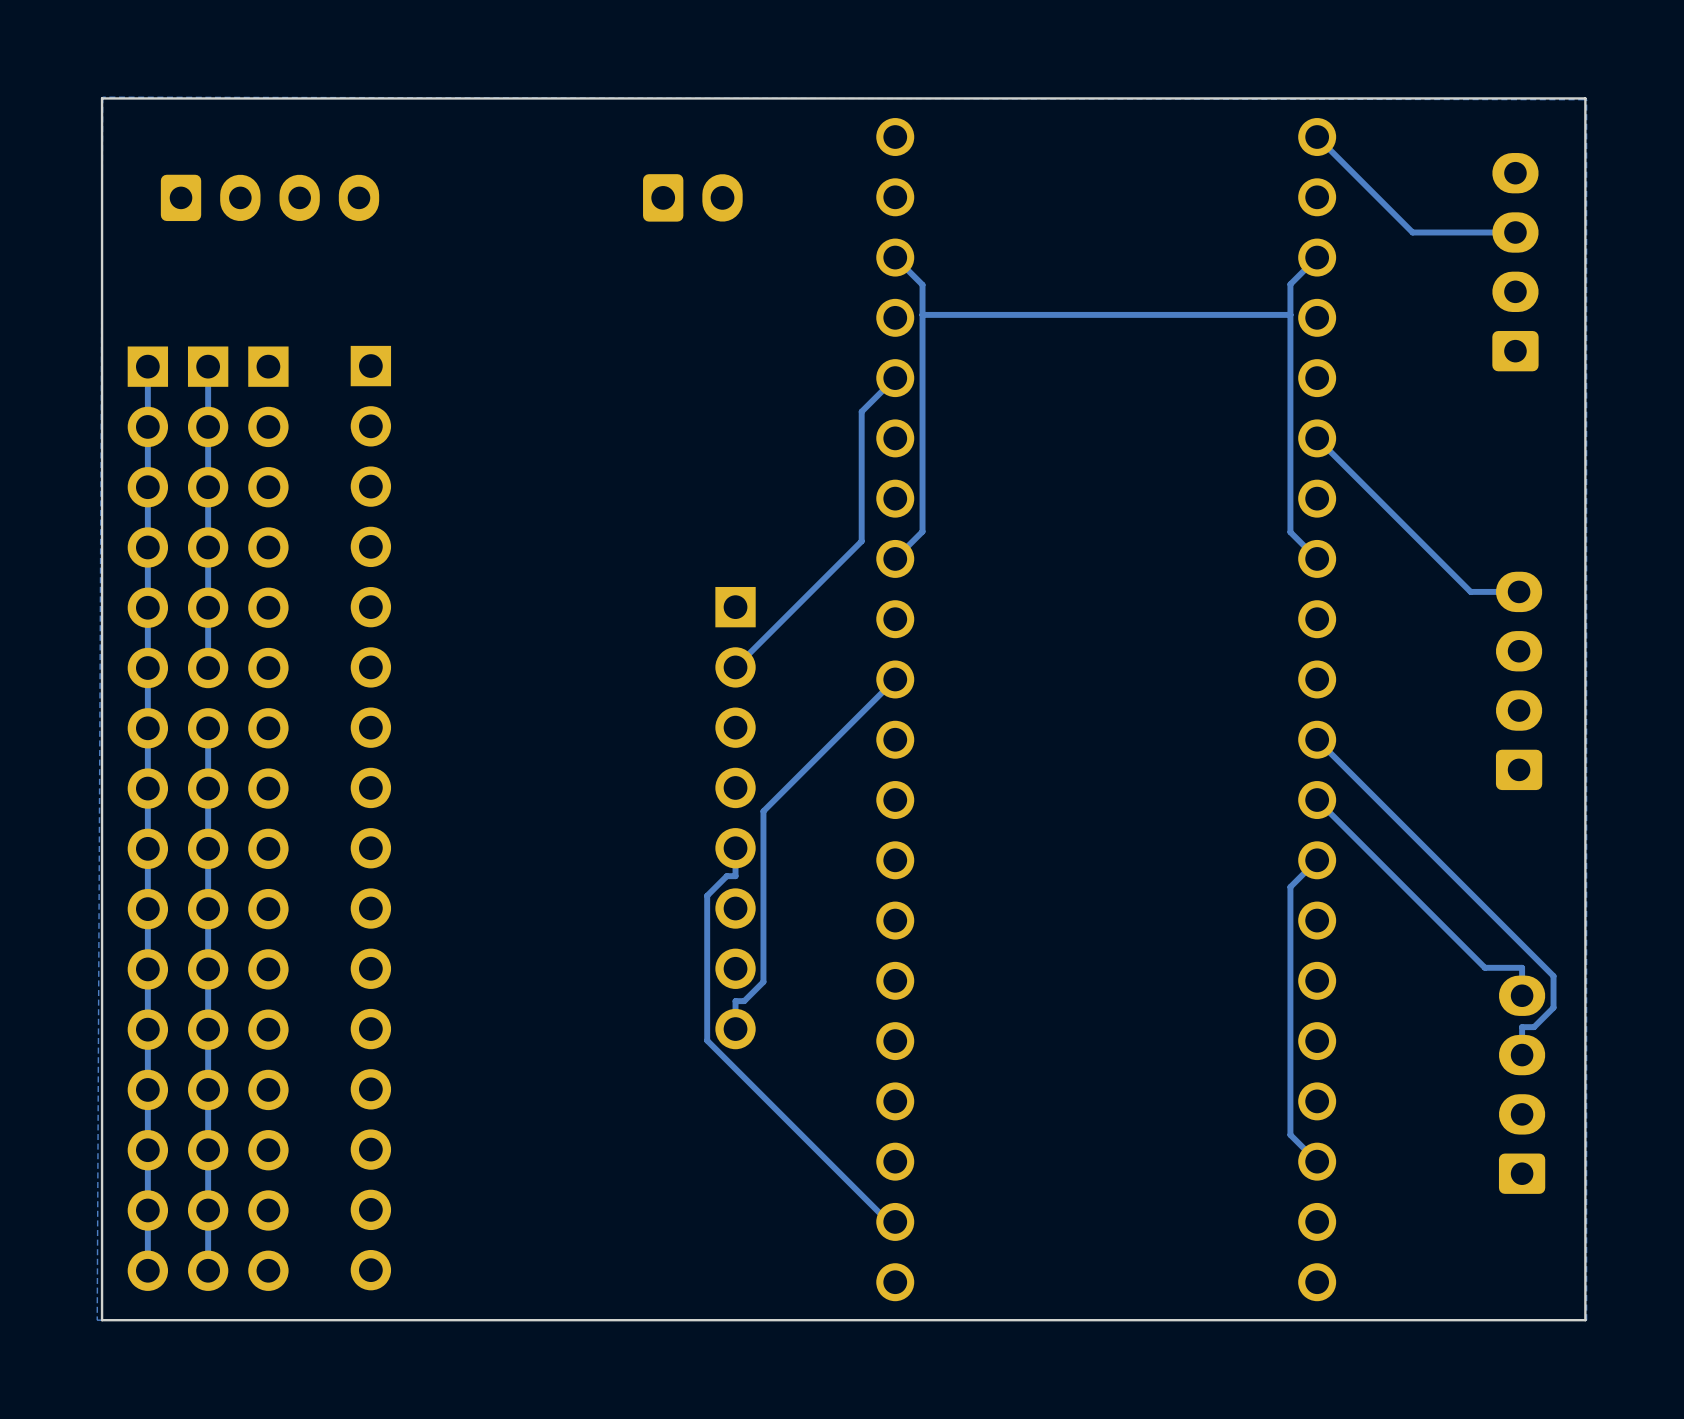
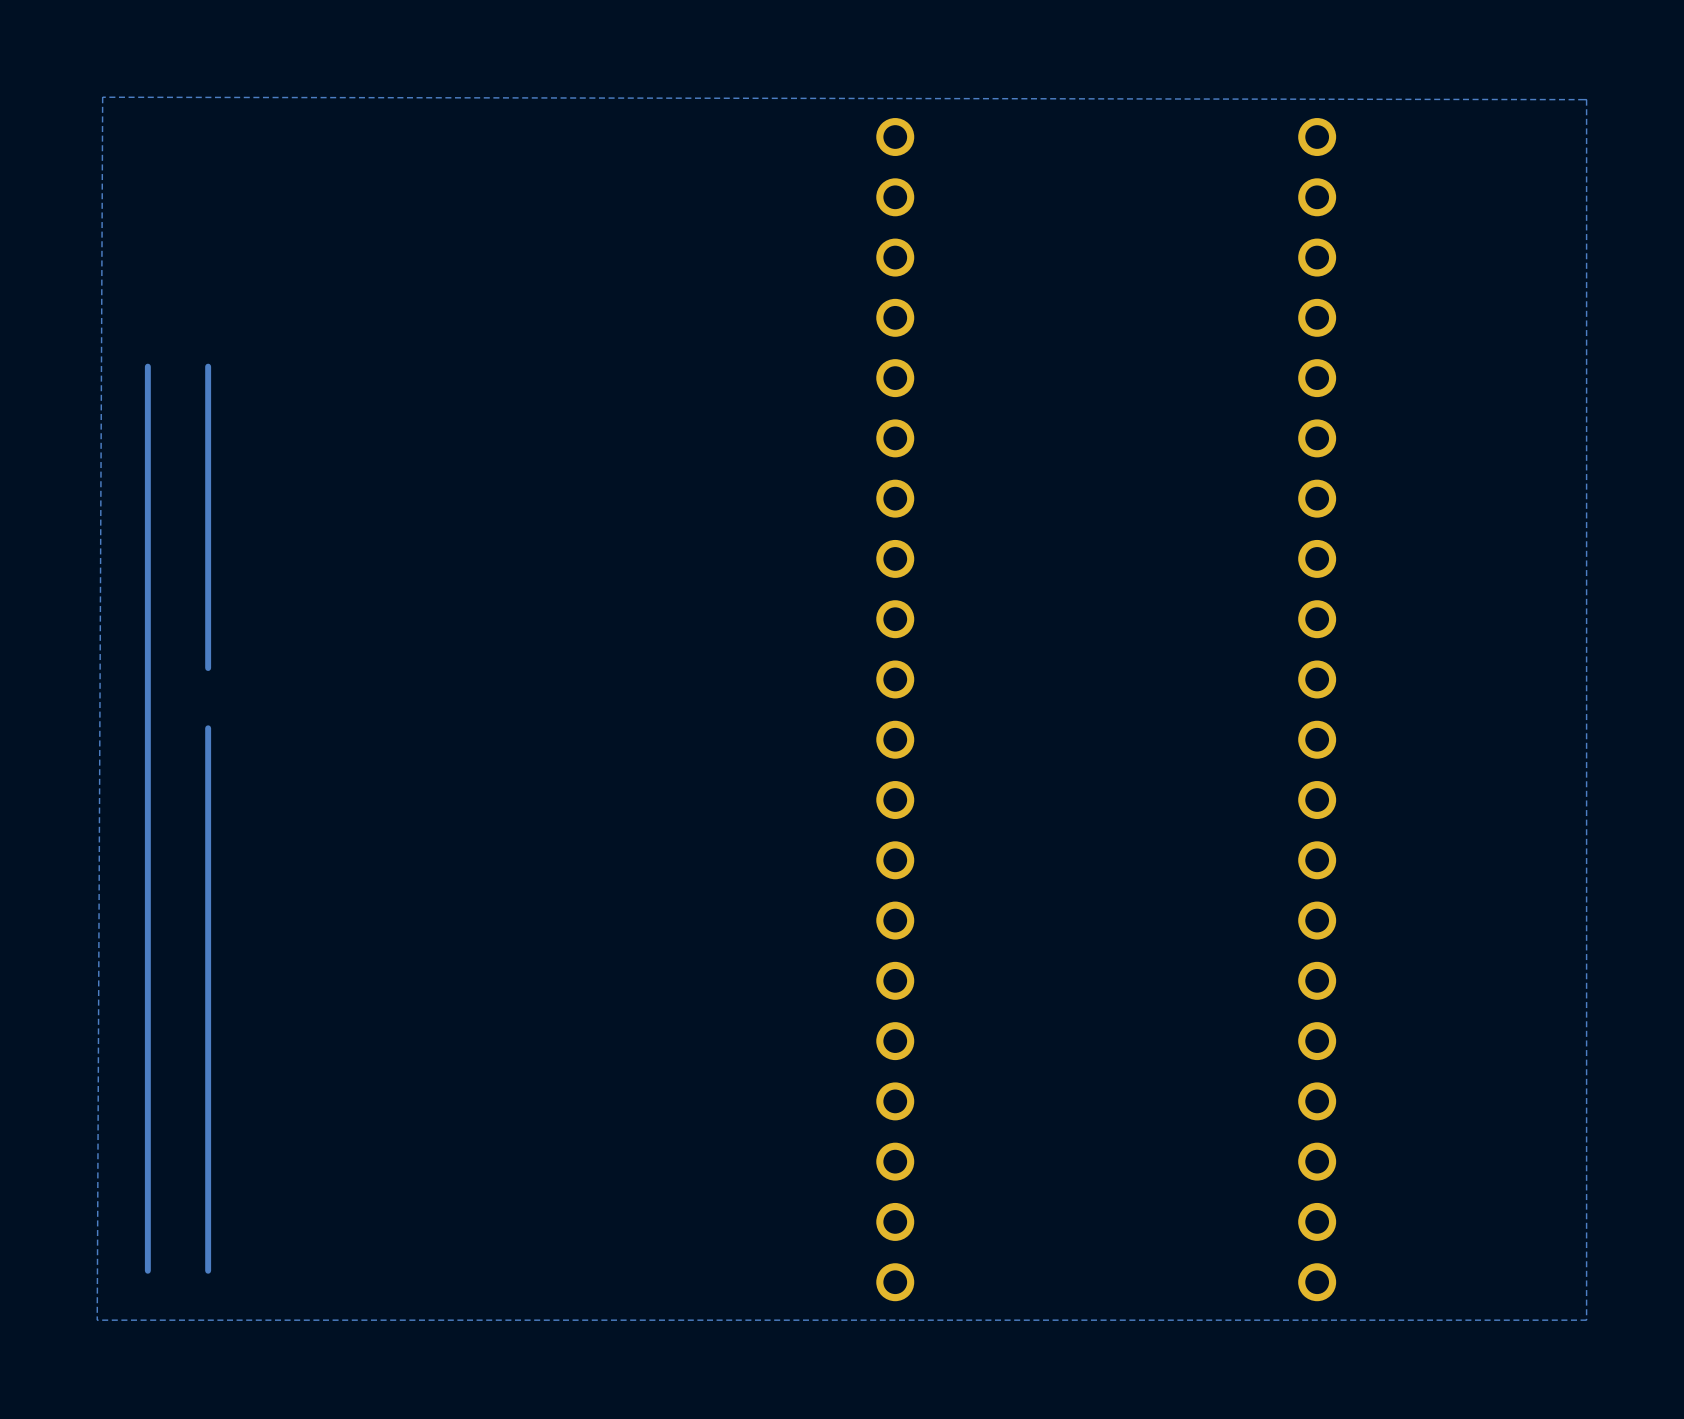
board edge: (1585, 98) (102, 98) (102, 1320) (1585, 1320) (1585, 98) -> none
track: (1317, 137) (1412, 232) (1515, 232) -> none
part: (270, 197) -> none
part: (692, 197) -> none
track: (895, 257) (922, 284) (922, 531) (895, 558) -> none
track: (1317, 257) (1290, 284) (1290, 532) (1317, 558) -> none
part: (1515, 262) -> none
track: (1290, 314) (922, 314) -> none
track: (895, 378) (861, 411) (861, 541) (735, 667) -> none
track: (1317, 438) (1470, 591) (1519, 591) -> none
track: (895, 679) (763, 811) (763, 981) (744, 1001) (735, 1001) (735, 1029) -> none
part: (1519, 680) -> none
track: (1317, 739) (1553, 976) (1553, 1007) (1534, 1027) (1522, 1027) (1522, 1055) -> none
track: (1317, 800) (1484, 967) (1522, 967) (1522, 995) -> none
part: (147, 818) -> none
part: (208, 818) -> none
part: (268, 818) -> none
part: (370, 818) -> none
part: (735, 818) -> none
track: (735, 848) (735, 876) (726, 876) (707, 895) (707, 1040) (888, 1221) (895, 1221) -> none
track: (1317, 860) (1290, 887) (1290, 1134) (1317, 1161) -> none
part: (1522, 1084) -> none

